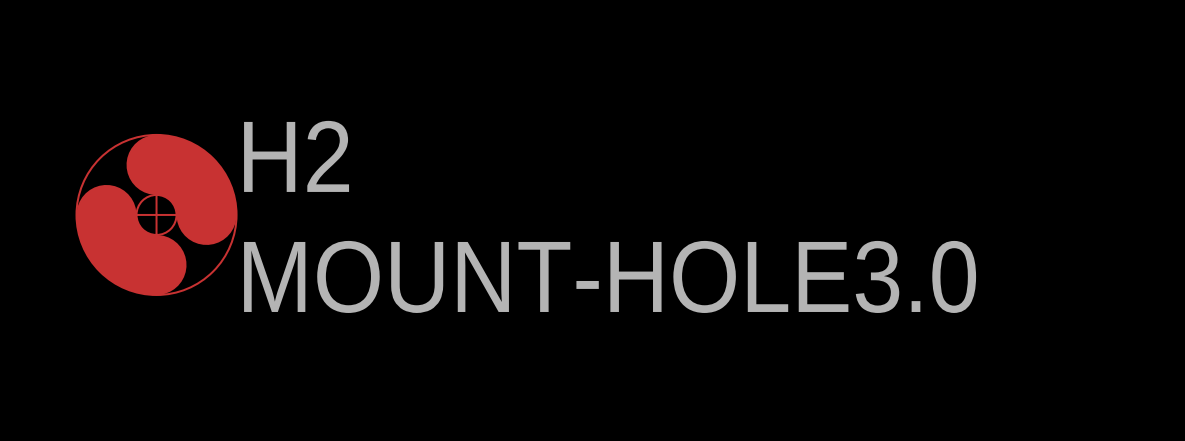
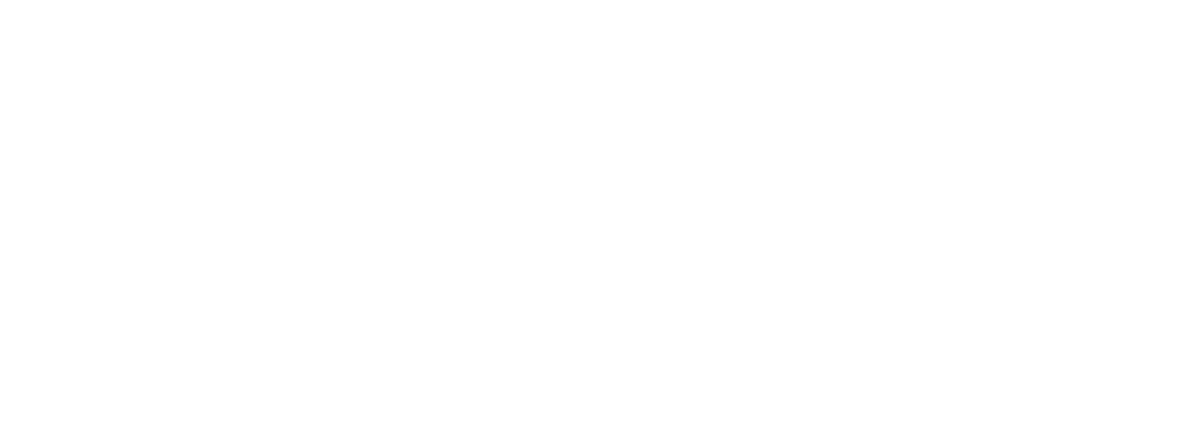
H2: MOUNT-HOLE3.0 (156, 214) -> none

